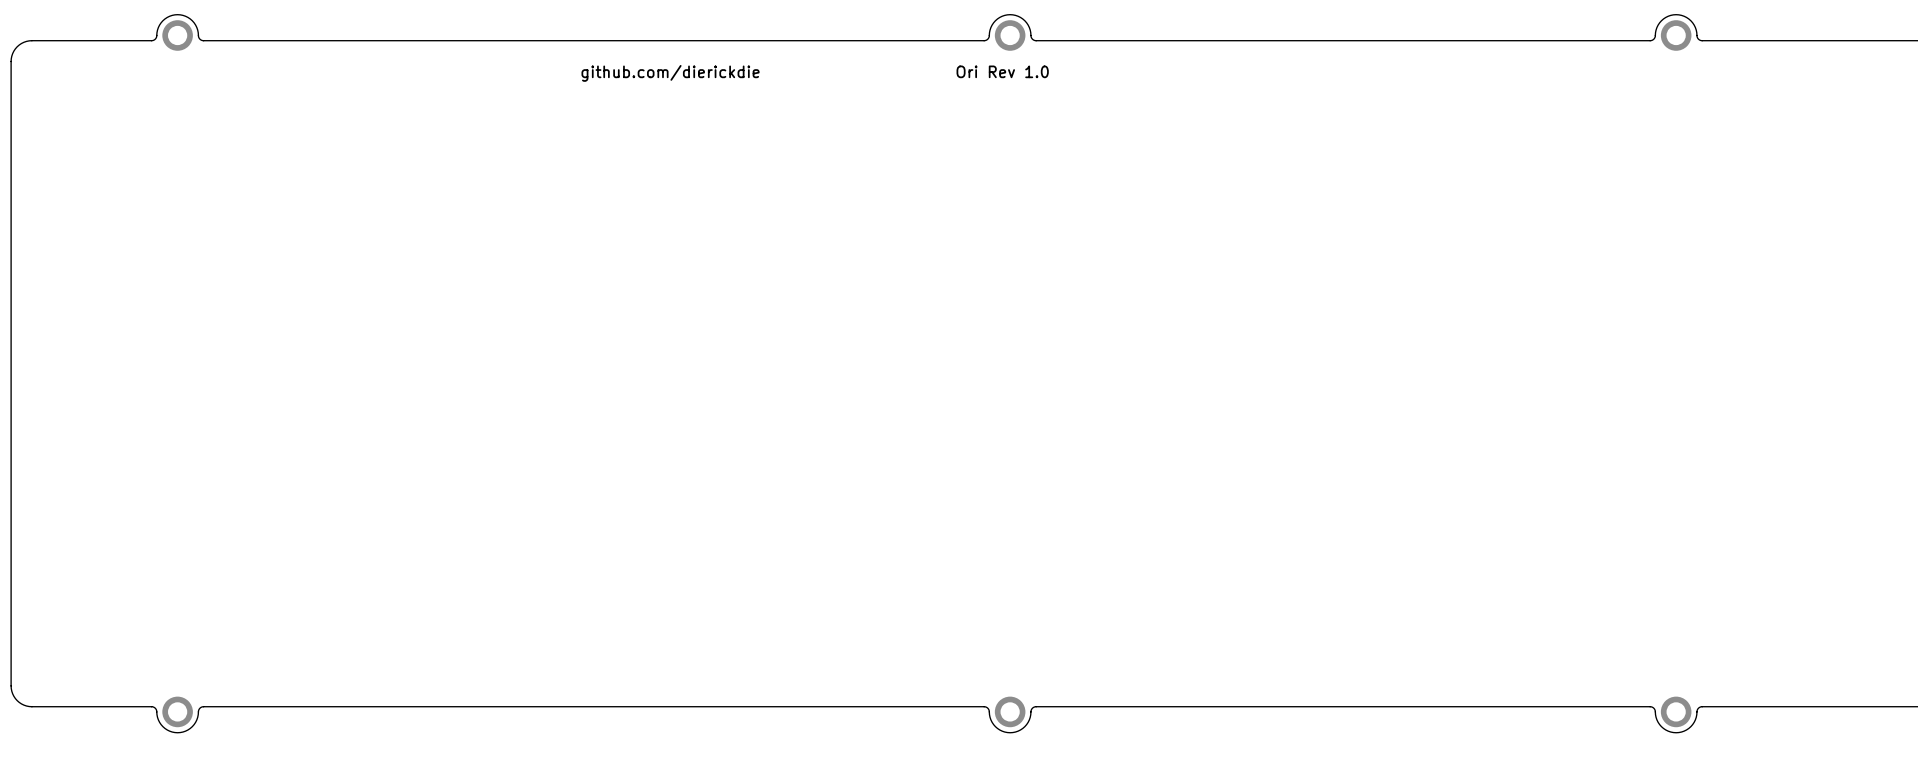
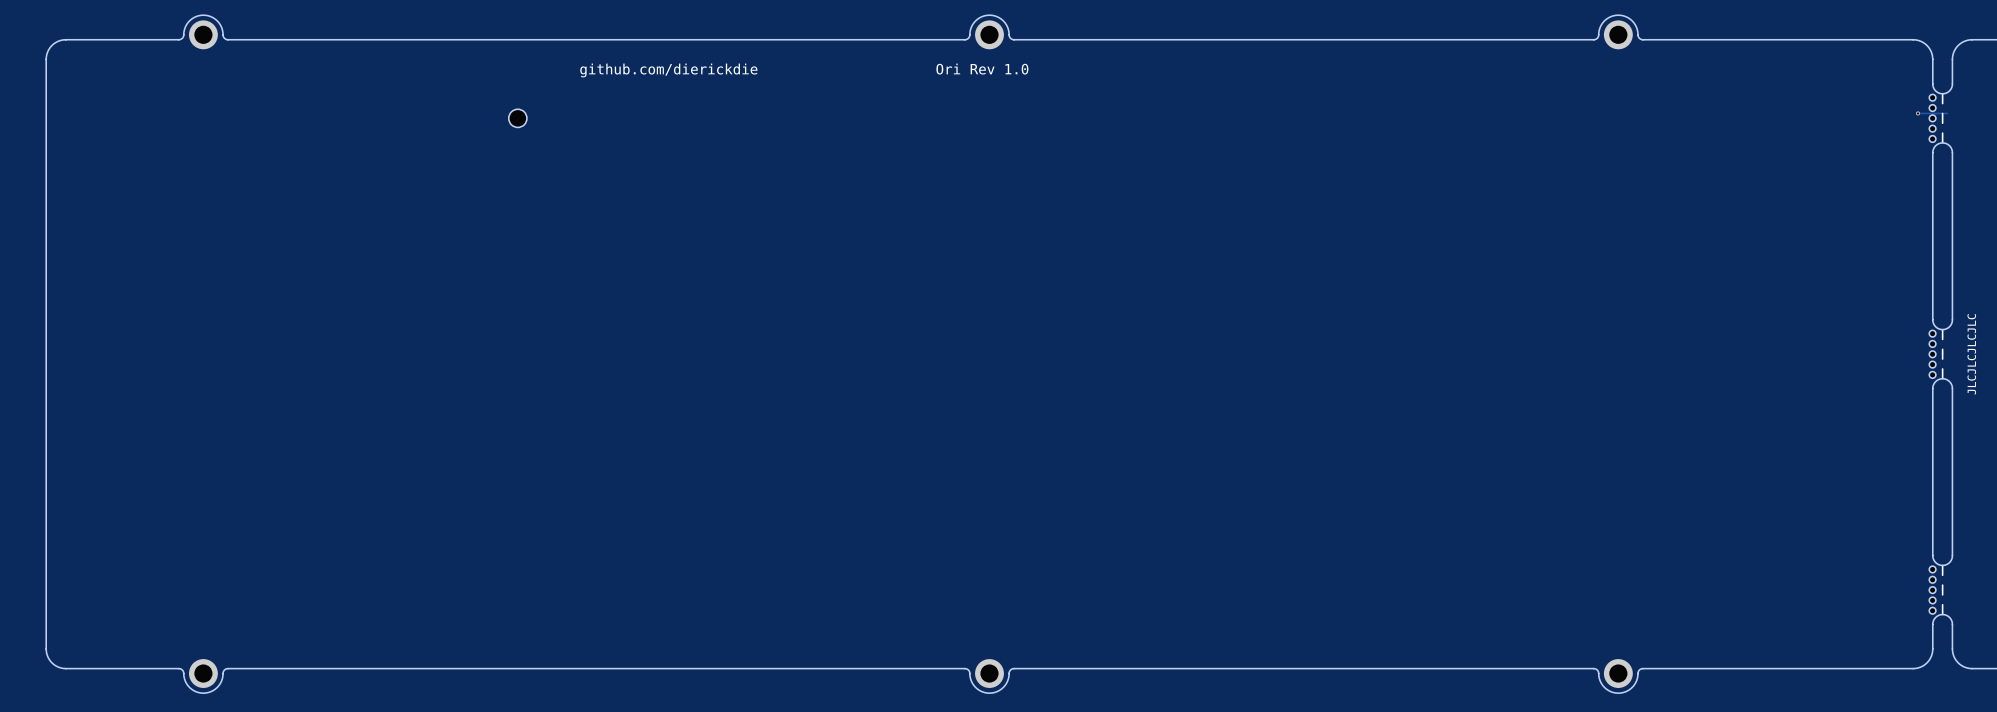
part: none -> (517, 118)

